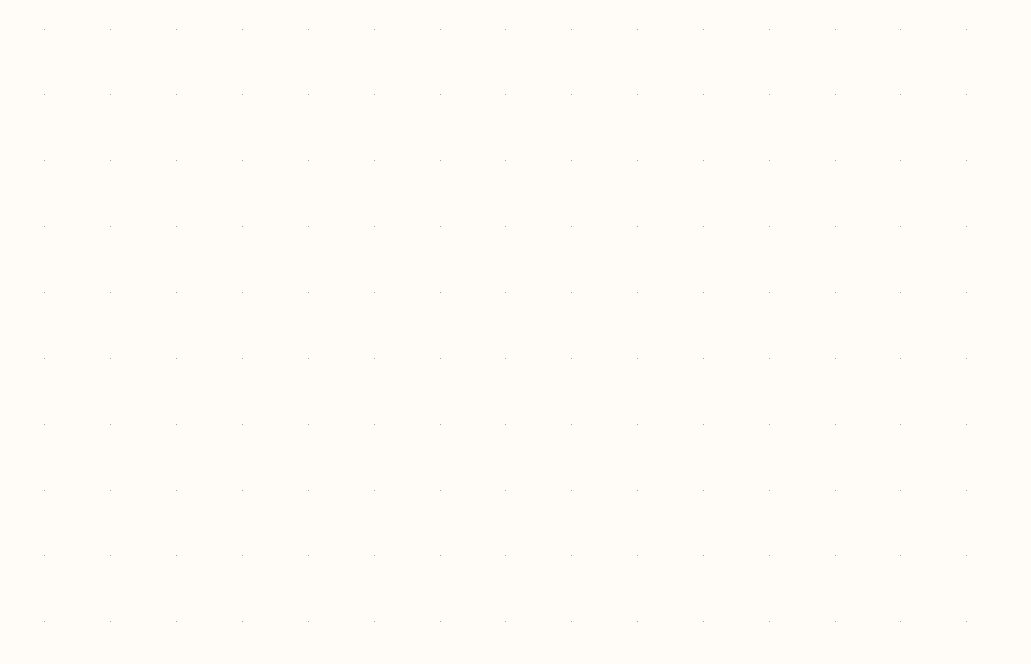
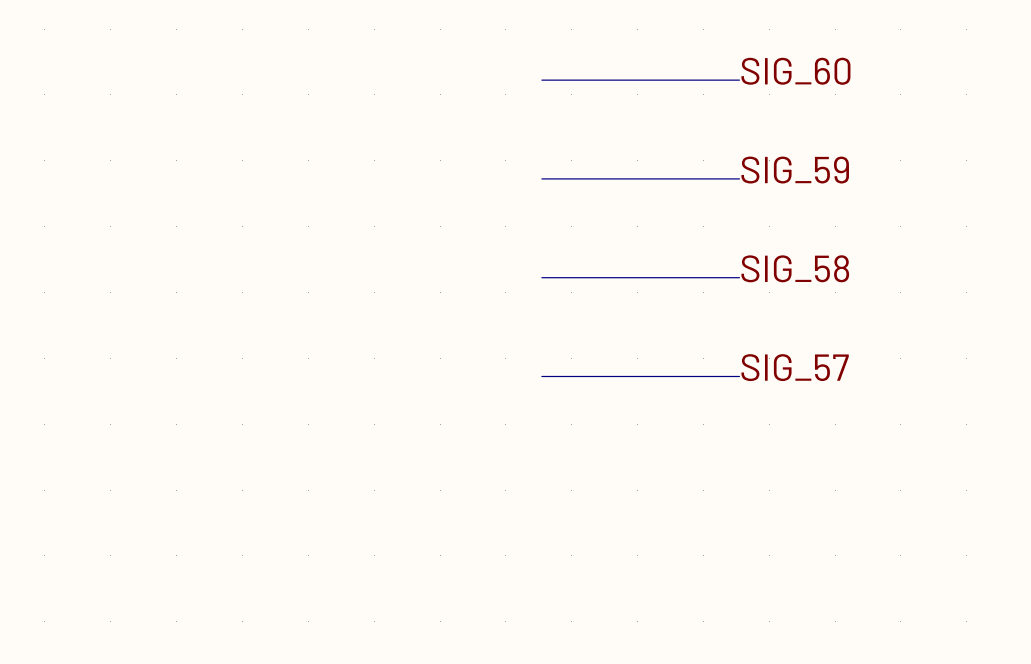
label: none -> SIG_60 (795, 71)
wire: none -> (541, 80) (739, 80)
label: none -> SIG_59 (795, 170)
wire: none -> (541, 178) (739, 178)
label: none -> SIG_58 (795, 268)
wire: none -> (541, 277) (739, 277)
label: none -> SIG_57 (795, 367)
wire: none -> (541, 376) (739, 376)

